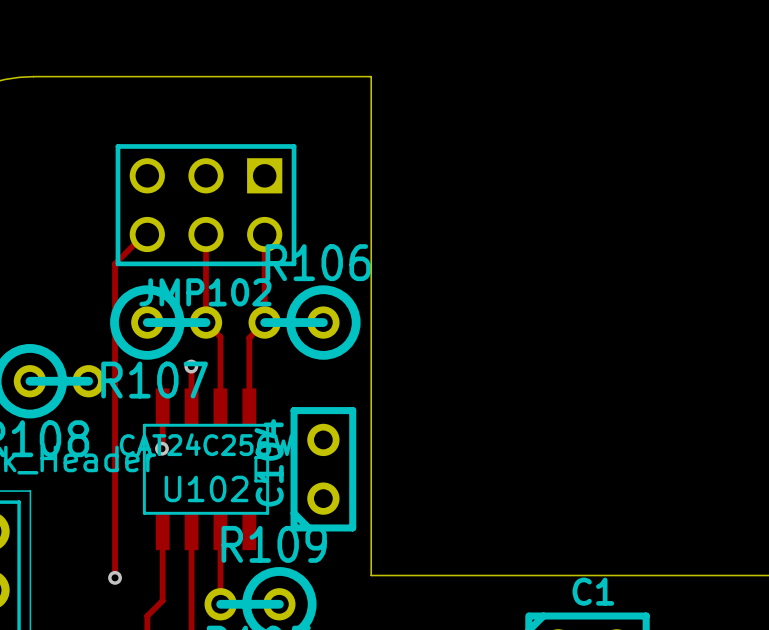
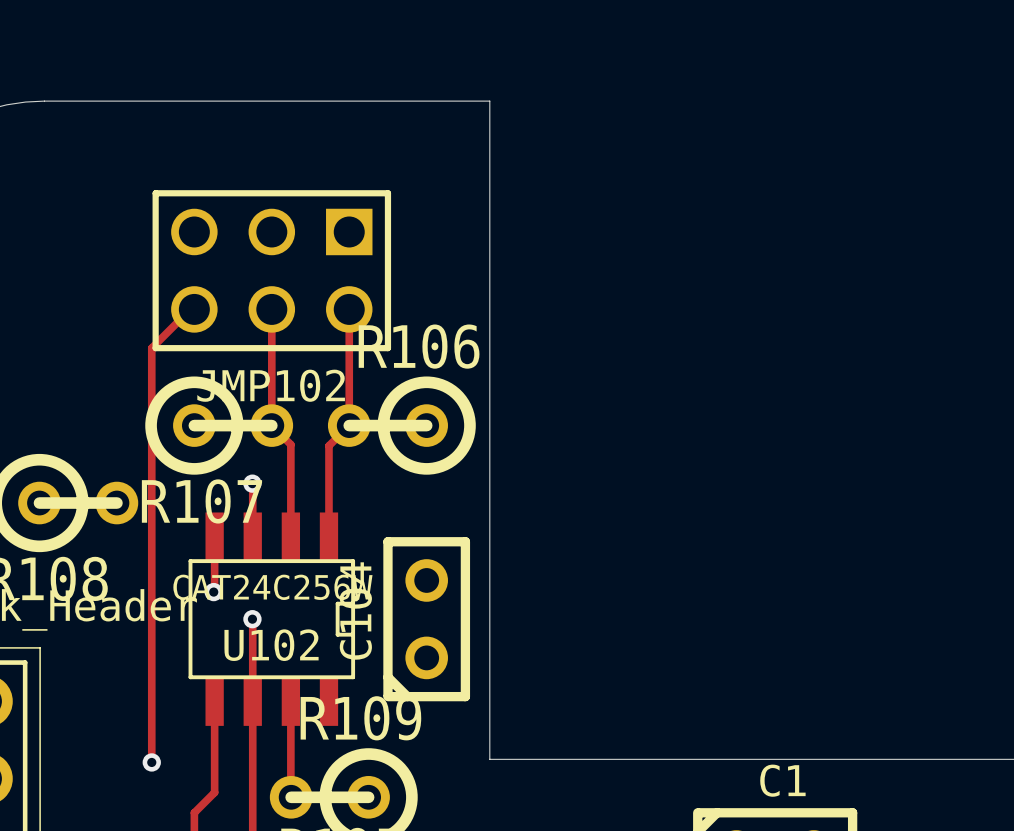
track: none -> (252, 619) (252, 701)
via: none -> (252, 619)

